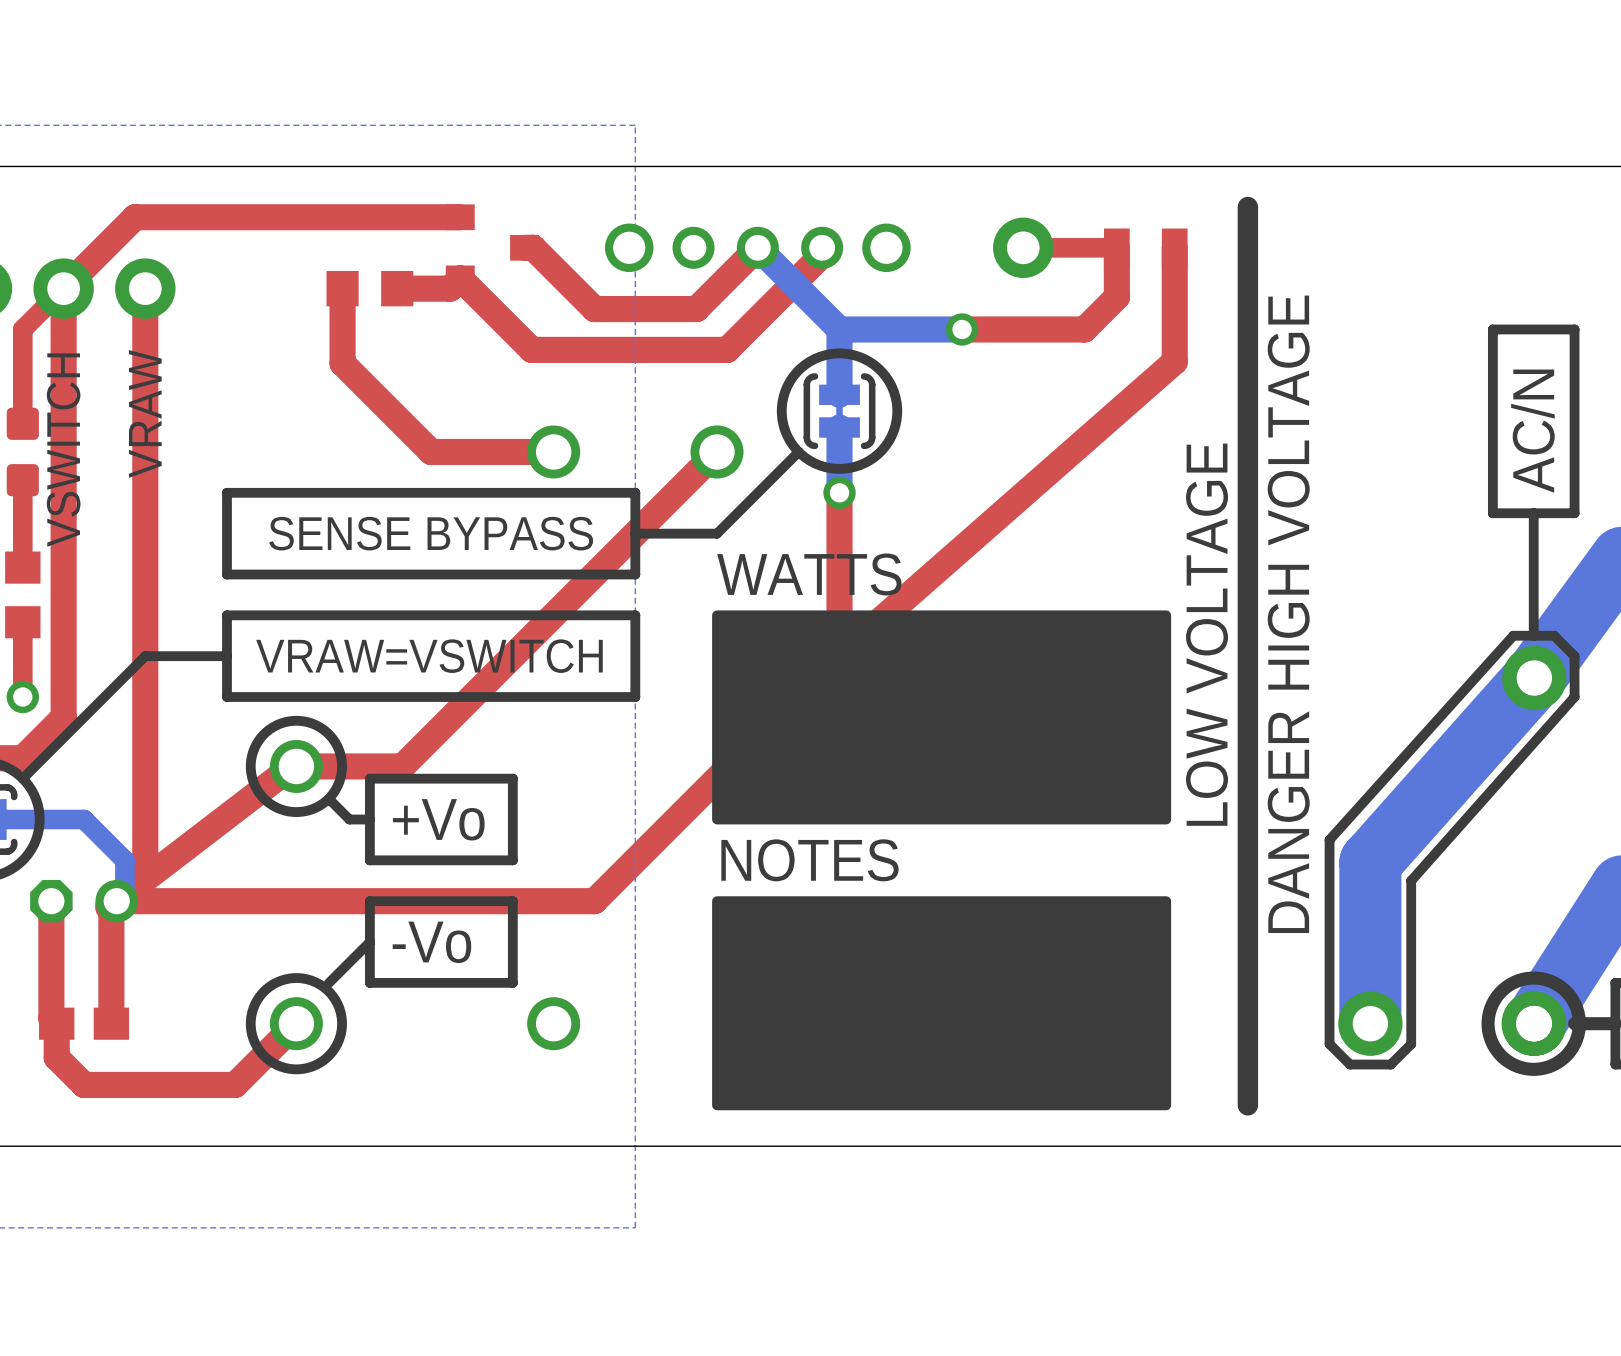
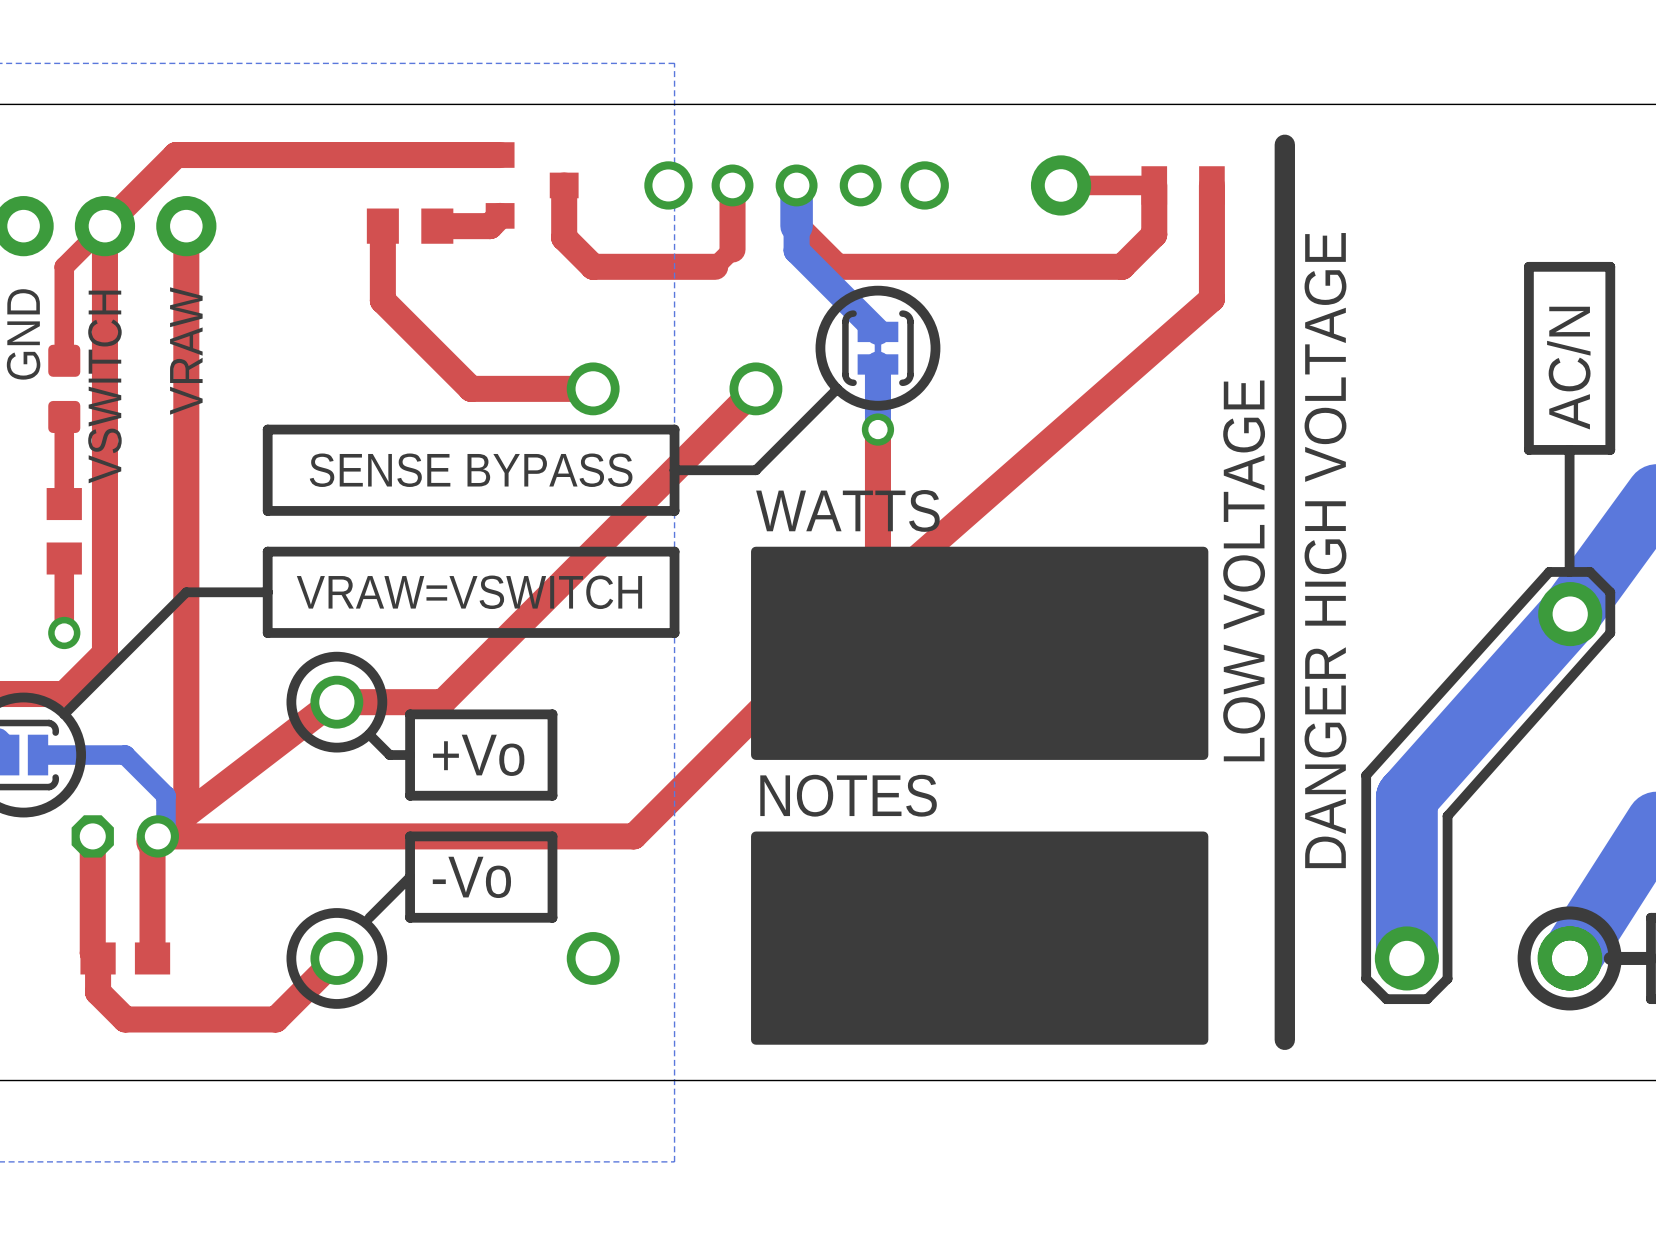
bottom track: (757, 247) (839, 329) -> none
top track: (757, 247) (696, 309) (594, 309) (533, 247) (524, 247) -> (732, 185) (732, 249) (715, 266) (593, 266) (564, 237) (564, 185)
top track: none -> (796, 185) (796, 226) (837, 266) (1000, 266)
top track: (822, 247) (822, 254) (727, 349) (531, 349) (460, 278) -> none
bottom track: (839, 329) (839, 394) -> (796, 226) (796, 185) (796, 250) (877, 331)
bottom track: (962, 329) (839, 329) -> none
via: (962, 329) -> none

